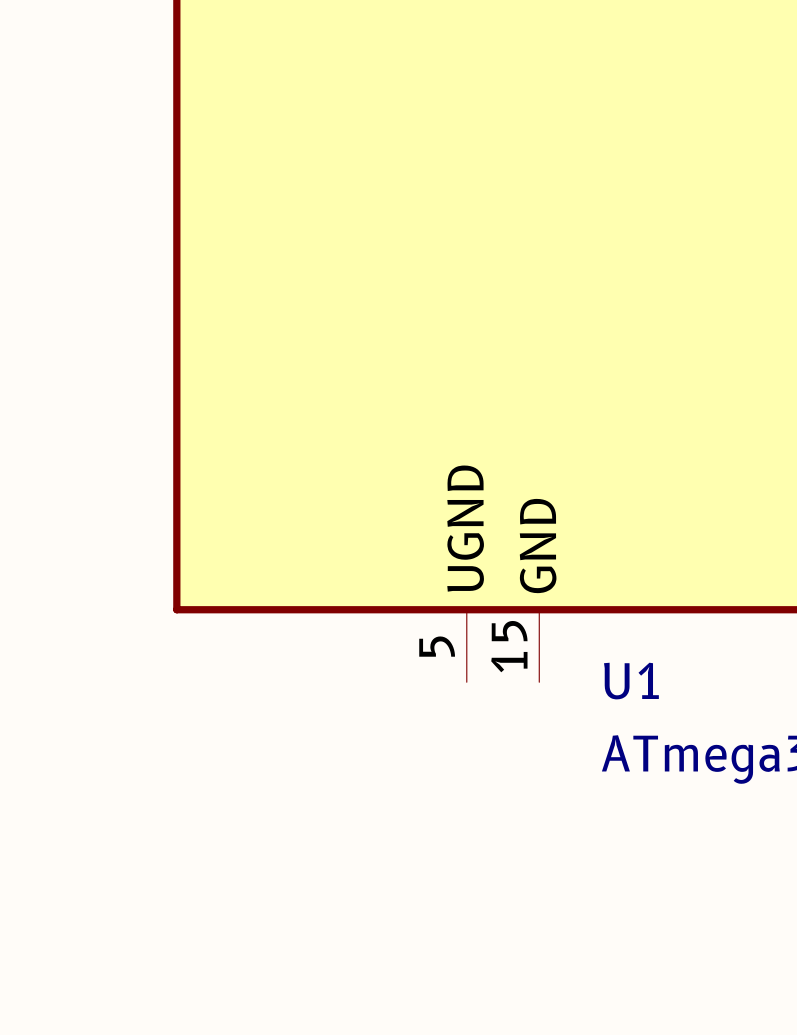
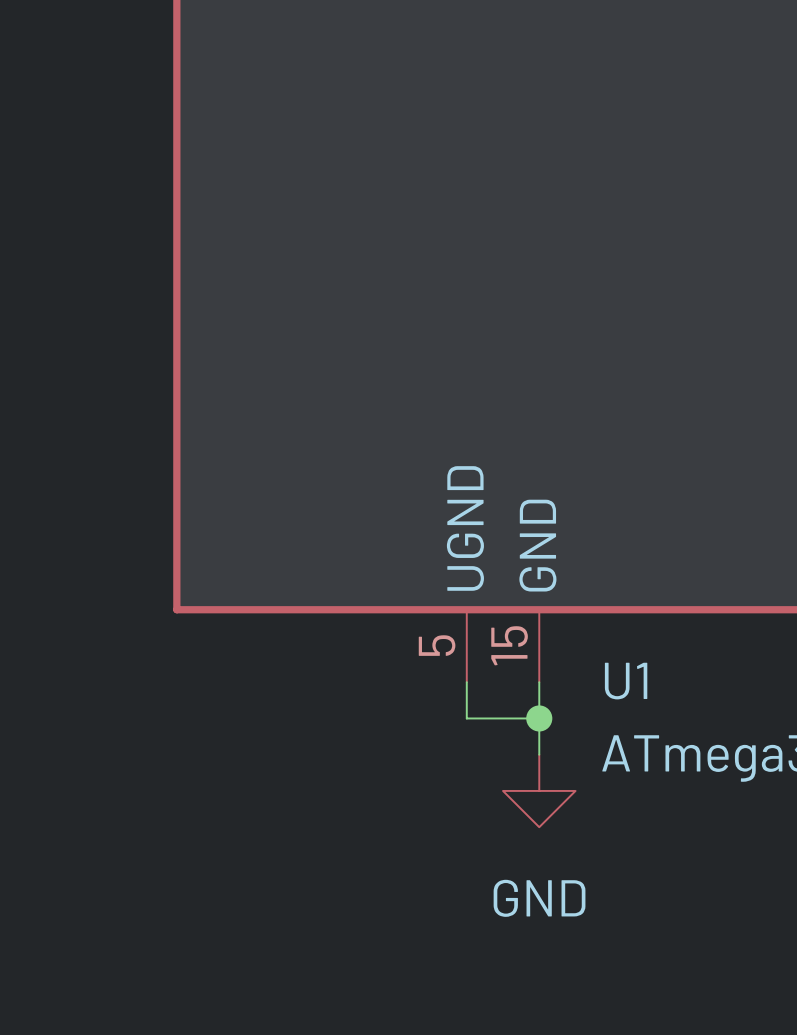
wire: none -> (466, 682) (466, 718) (539, 718)
wire: none -> (539, 682) (539, 754)
junction: none -> (539, 718)
power symbol: none -> GND (539, 790)

